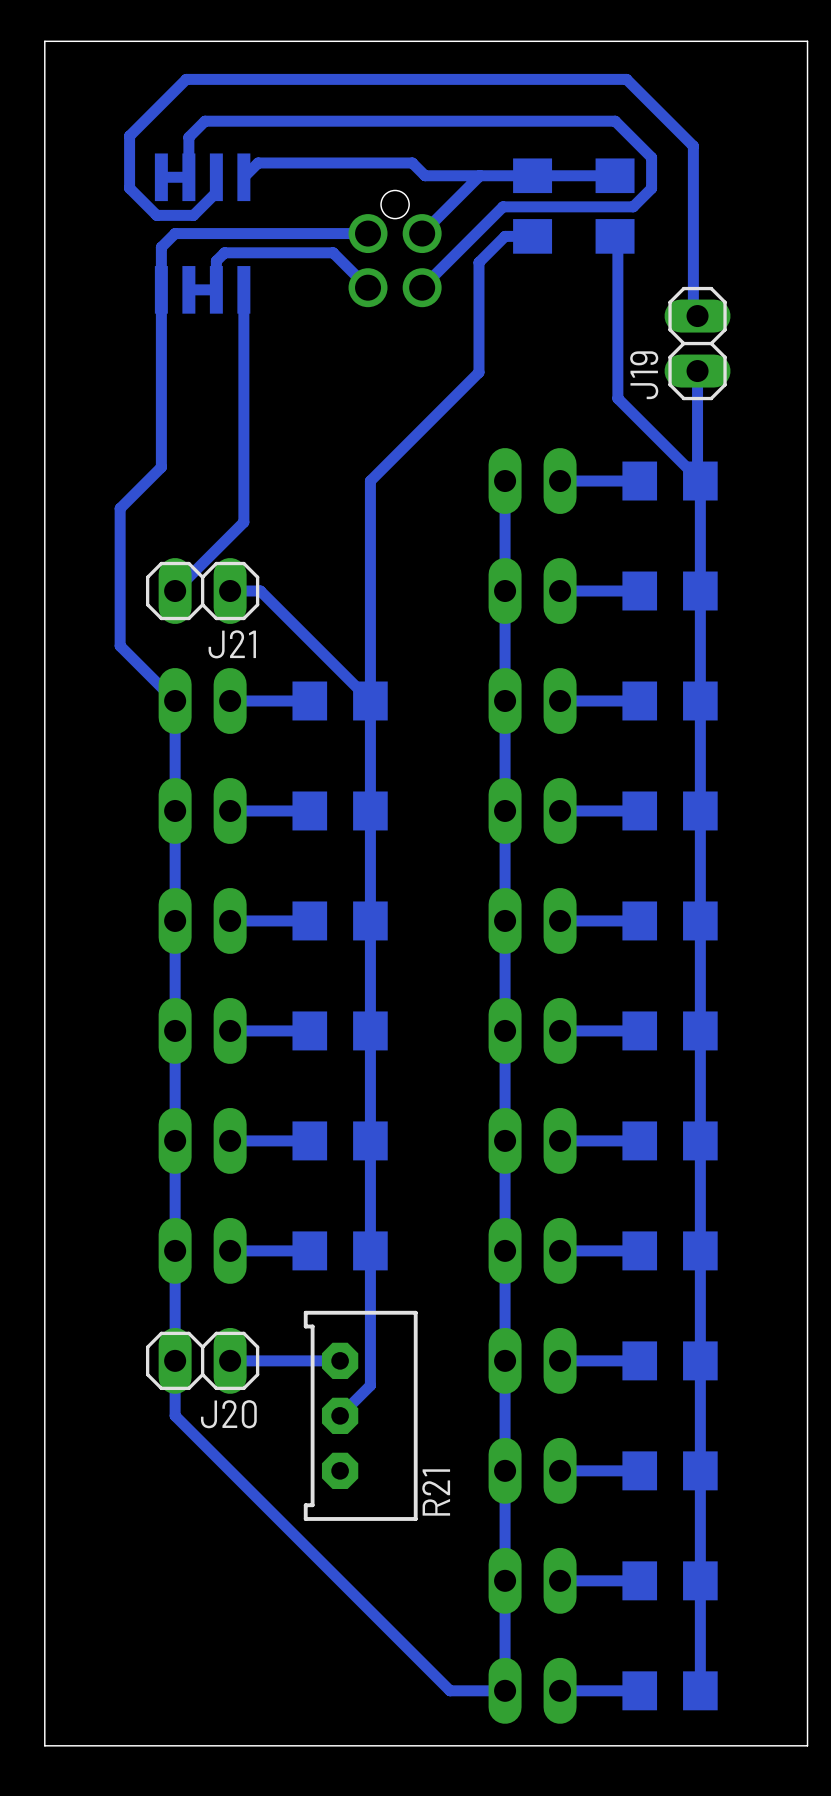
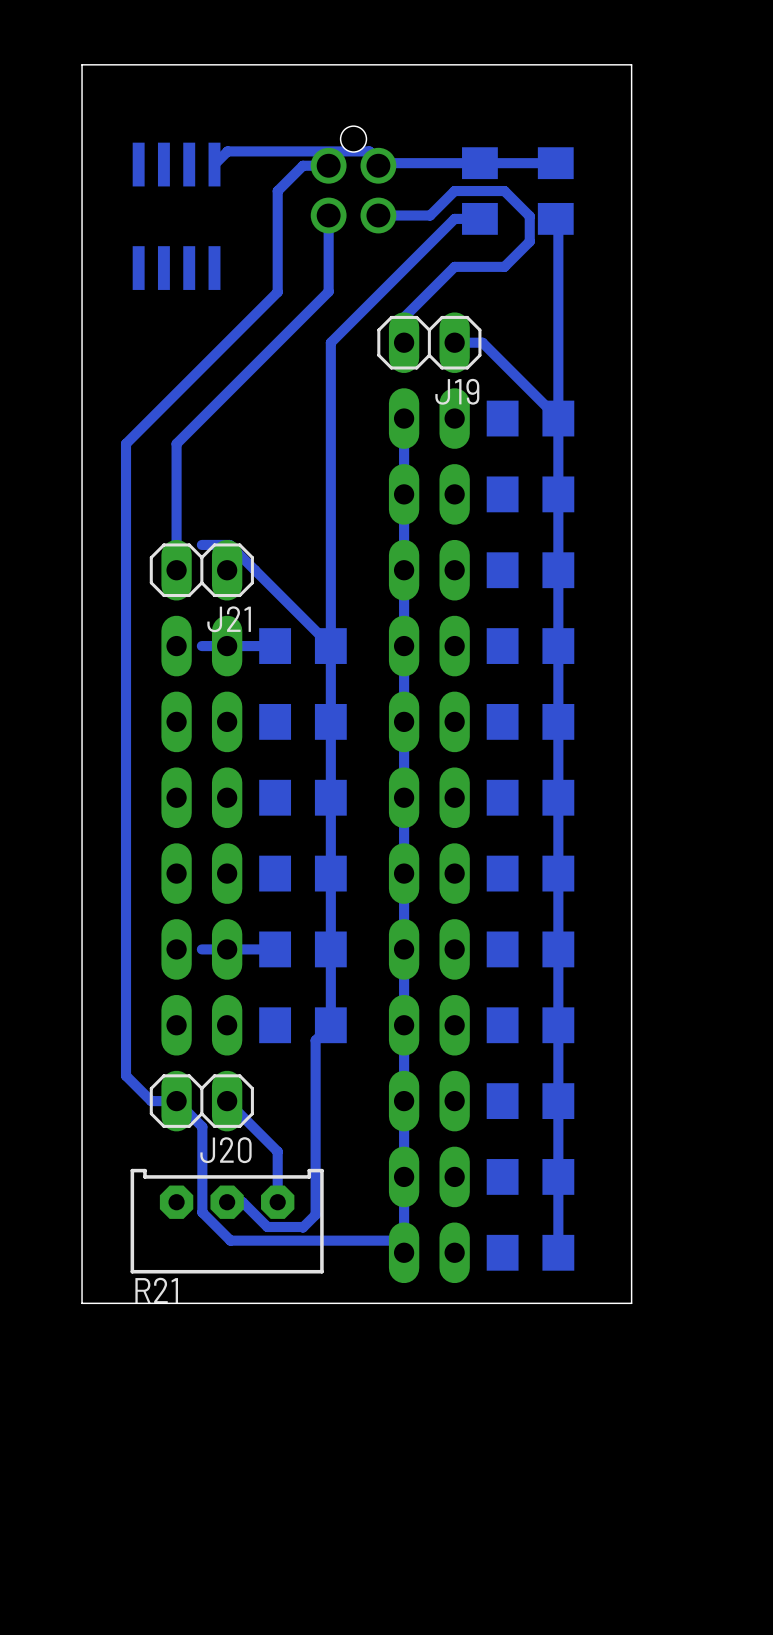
board edge: (44, 41) (44, 1745) (807, 1745) (807, 41) (44, 41) -> (82, 64) (82, 1303) (631, 1303) (631, 64) (82, 64)
bottom track: (479, 175) (422, 233) -> (404, 342) (404, 317) (454, 266) (504, 266) (529, 241) (529, 216) (504, 191) (454, 191) (430, 215) (378, 215)
bottom track: (161, 177) (188, 177) (188, 137) (205, 121) (615, 121) (651, 157) (651, 188) (633, 206) (502, 206) (422, 287) -> none
bottom track: (216, 177) (216, 192) (193, 215) (156, 215) (129, 188) (129, 136) (186, 79) (626, 79) (693, 146) (693, 311) (697, 316) -> none
bottom track: none -> (328, 215) (328, 291) (176, 443) (176, 570)
bottom track: (368, 233) (175, 233) (161, 247) (161, 467) -> (328, 165) (302, 165) (277, 191) (277, 292) (138, 431)
part position: (395, 248) -> (353, 179)
bottom track: (478, 262) (478, 372) (370, 481) -> (430, 242) (330, 342) (330, 443)
bottom track: (368, 287) (333, 252) (224, 252) (216, 261) (216, 289) (188, 289) -> none
bottom track: (243, 289) (243, 522) (175, 591) -> none
J19 rotation: 0° (697, 343) -> 90° clockwise (429, 342)
J19 position: (697, 343) -> (429, 342)
bottom track: none -> (454, 342) (482, 342) (558, 418)
bottom track: (697, 371) (697, 478) -> none
J19 name position: J19 (644, 375) -> J19 (457, 391)
bottom track: (617, 398) (700, 481) (700, 1690) -> (558, 367) (558, 1252)
part: none -> (429, 418)
part: none -> (530, 418)
bottom track: (147, 481) (120, 508) (120, 645) (175, 700) (175, 1415) (450, 1690) (505, 1690) (505, 481) -> (126, 443) (126, 1075) (151, 1101) (176, 1101) (202, 1126) (202, 1212) (230, 1240) (391, 1240) (404, 1252) (404, 418)
part: (532, 481) -> none
bottom track: (560, 481) (639, 481) -> none
part: (670, 481) -> none
part: none -> (429, 494)
part: none -> (530, 494)
J21 position: (202, 591) -> (201, 570)
part: (532, 591) -> none
bottom track: (560, 591) (639, 591) -> none
part: (670, 591) -> none
part: none -> (429, 570)
part: none -> (530, 570)
part position: (202, 700) -> (201, 646)
part: none -> (429, 646)
part: (532, 700) -> none
bottom track: (560, 700) (639, 700) -> none
part: none -> (530, 646)
part: (670, 700) -> none
part: none -> (201, 721)
part: none -> (302, 721)
part: none -> (429, 721)
part: none -> (530, 721)
part: (202, 810) -> none
bottom track: (230, 810) (309, 810) -> none
part: (340, 810) -> none
part: (532, 810) -> none
bottom track: (560, 810) (639, 810) -> none
part: (670, 810) -> none
part: none -> (201, 797)
part: none -> (302, 797)
part: none -> (429, 797)
part: none -> (530, 797)
part: (202, 920) -> none
bottom track: (230, 920) (309, 920) -> none
part: (340, 920) -> none
part: (532, 920) -> none
bottom track: (560, 920) (639, 920) -> none
part: (670, 920) -> none
part: none -> (201, 873)
part: none -> (302, 873)
part: none -> (429, 873)
part: none -> (530, 873)
part position: (202, 1030) -> (201, 949)
part: none -> (429, 949)
part: (532, 1030) -> none
bottom track: (560, 1030) (639, 1030) -> none
part: none -> (530, 949)
part: (670, 1030) -> none
bottom track: (370, 1113) (370, 1385) (340, 1415) -> (330, 1025) (315, 1040) (315, 1214) (302, 1227) (267, 1226) (242, 1202) (227, 1202)
part: none -> (429, 1025)
part: none -> (530, 1025)
part position: (202, 1140) -> (201, 1025)
bottom track: (230, 1140) (309, 1140) -> none
part position: (340, 1140) -> (302, 1025)
part: (532, 1140) -> none
bottom track: (560, 1140) (639, 1140) -> none
part: (670, 1140) -> none
bottom track: none -> (227, 1101) (277, 1151) (277, 1202)
part: none -> (429, 1101)
part: none -> (530, 1101)
part: (202, 1250) -> none
bottom track: (230, 1250) (309, 1250) -> none
part: (340, 1250) -> none
part: (532, 1250) -> none
bottom track: (560, 1250) (639, 1250) -> none
part: (670, 1250) -> none
part: none -> (429, 1176)
part: none -> (530, 1176)
J20 position: (202, 1360) -> (201, 1101)
bottom track: (230, 1360) (340, 1360) -> none
part: none -> (429, 1252)
part: (532, 1360) -> none
bottom track: (560, 1360) (639, 1360) -> none
part: none -> (530, 1252)
part: (670, 1360) -> none
R21 rotation: 0° (360, 1415) -> 90° clockwise (227, 1221)
R21 position: (360, 1415) -> (227, 1221)
part: (532, 1470) -> none
bottom track: (560, 1470) (639, 1470) -> none
part: (670, 1470) -> none
part: (532, 1580) -> none
bottom track: (560, 1580) (639, 1580) -> none
part: (670, 1580) -> none
part: (532, 1690) -> none
bottom track: (560, 1690) (639, 1690) -> none
part: (670, 1690) -> none

